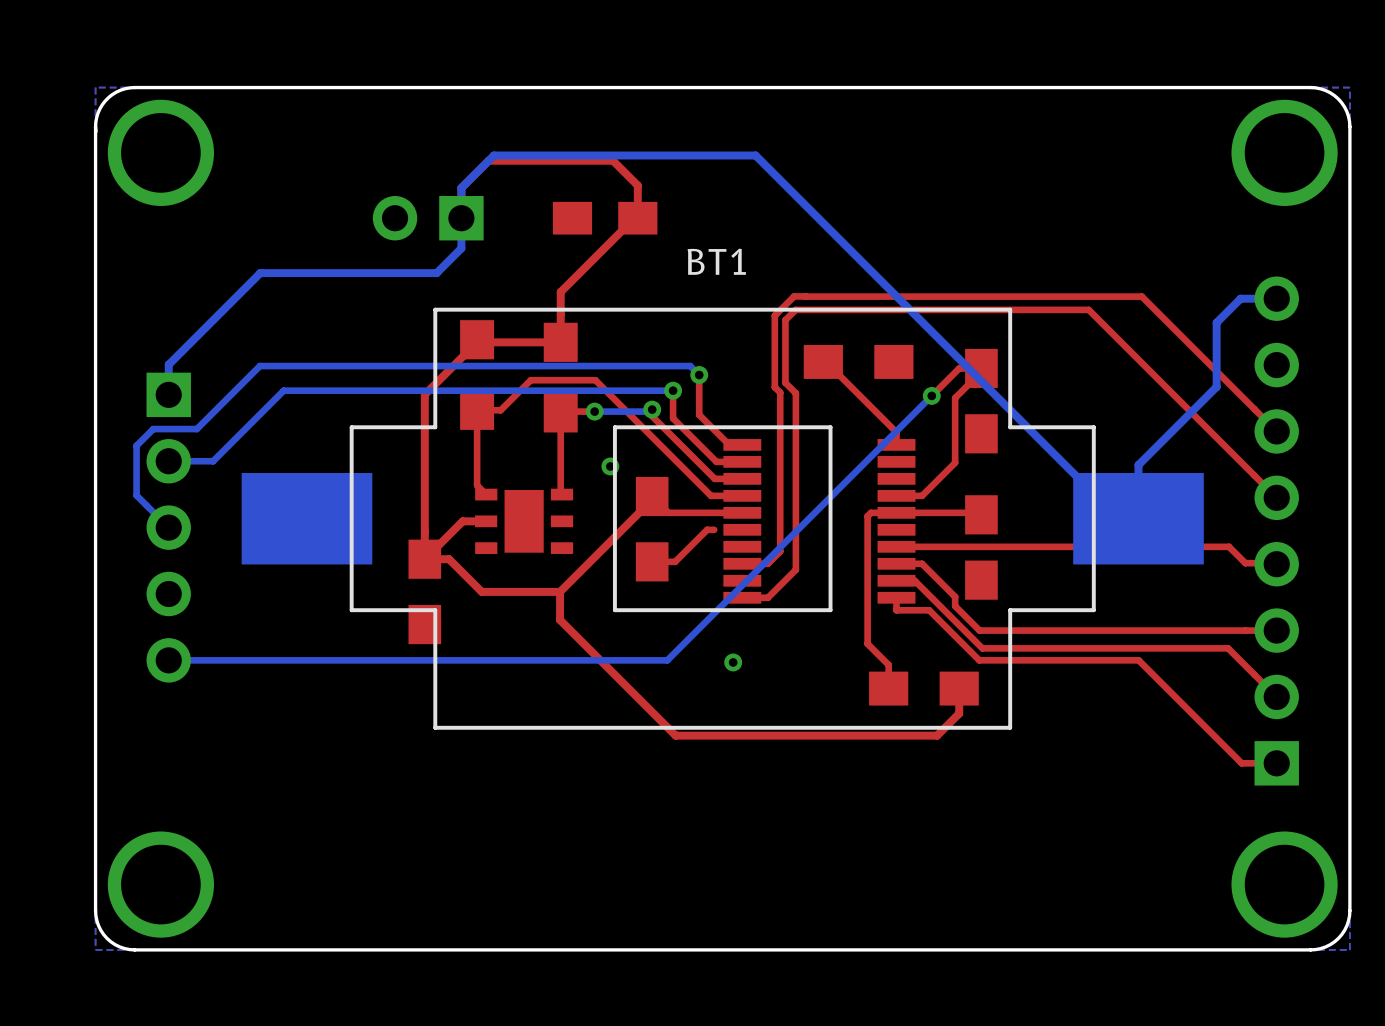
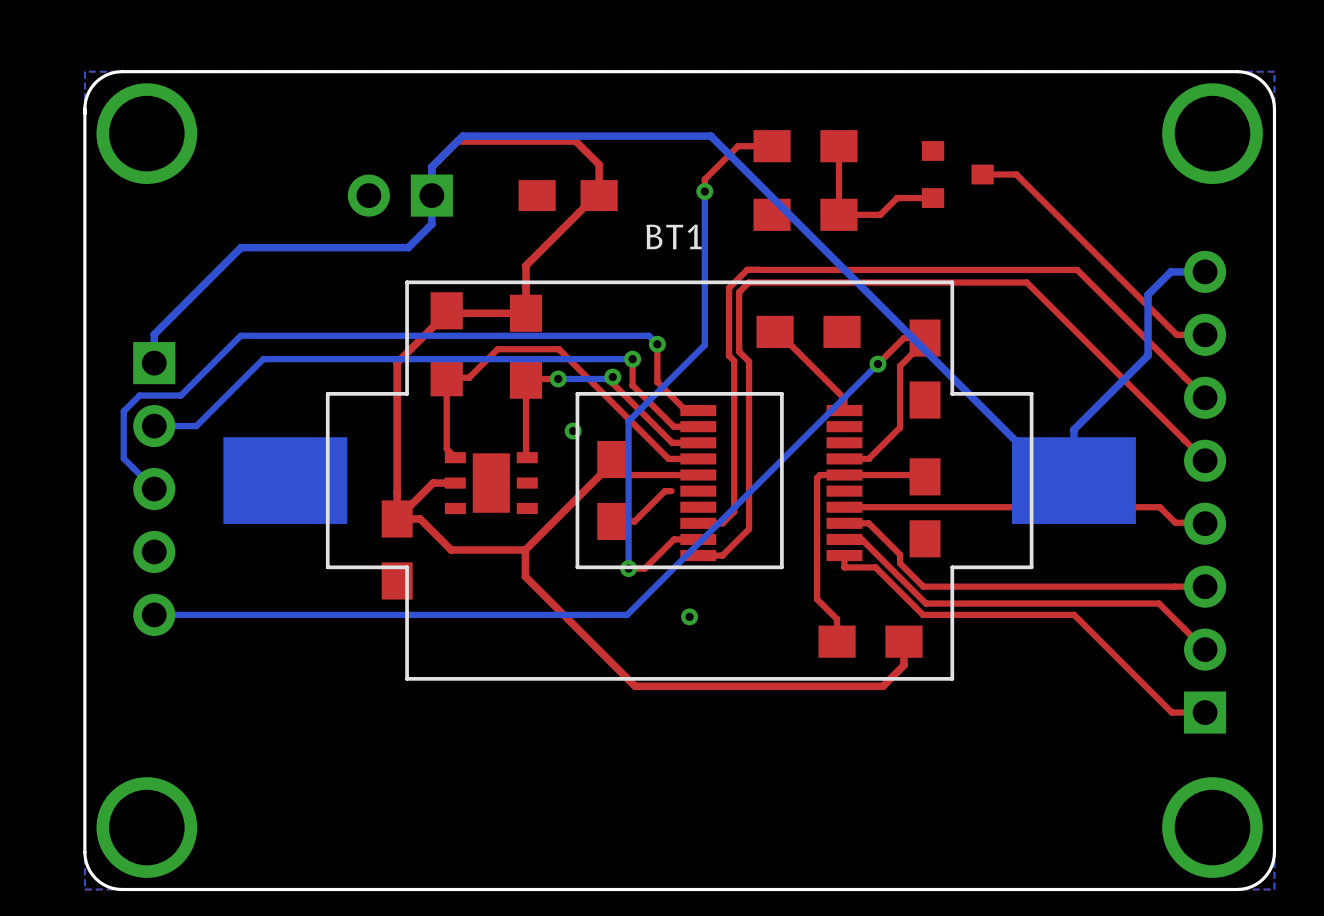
top track: none -> (772, 146) (738, 146) (704, 179) (704, 191)
part: none -> (805, 146)
top track: none -> (838, 146) (838, 214) (880, 214) (897, 198) (933, 198)
part: none -> (957, 174)
top track: none -> (982, 174) (1016, 174) (1176, 334) (1205, 334)
bottom track: none -> (704, 191) (704, 345) (628, 421) (628, 568)
via: none -> (704, 191)
part: none -> (805, 214)
top track: none -> (698, 539) (674, 539) (644, 568) (628, 568)
via: none -> (628, 568)

